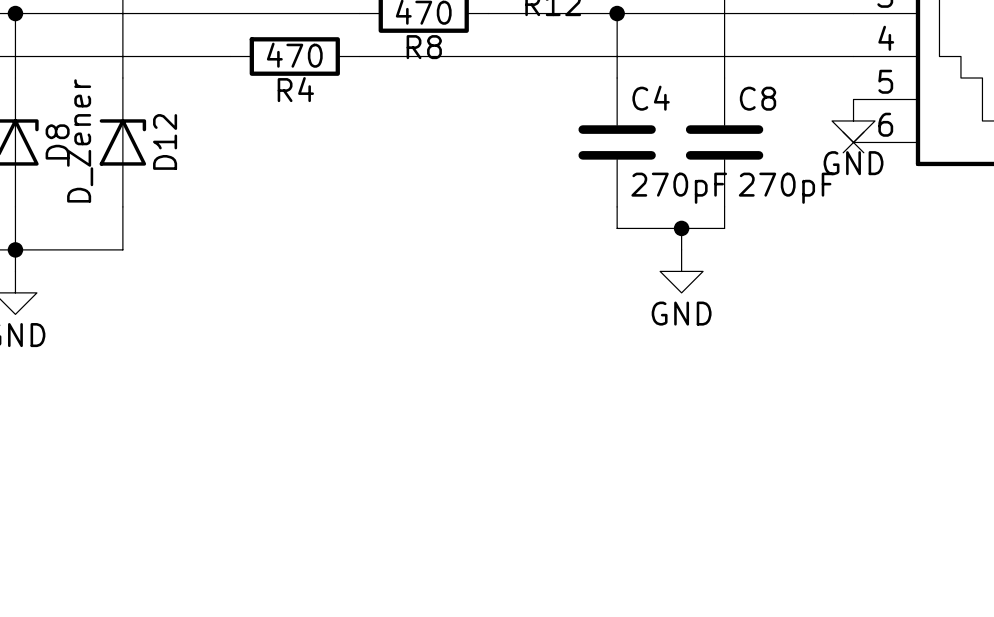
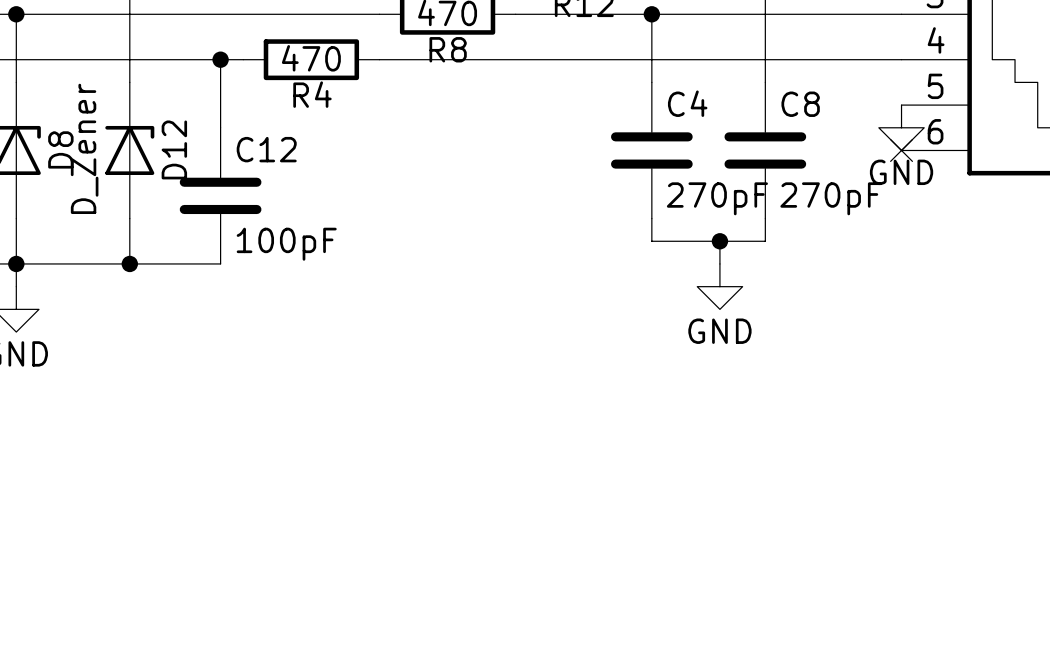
wire: none -> (220, 59) (220, 127)
junction: none -> (220, 59)
C12: none -> 100pF (220, 195)
wire: none -> (129, 263) (220, 263)
junction: none -> (129, 263)

